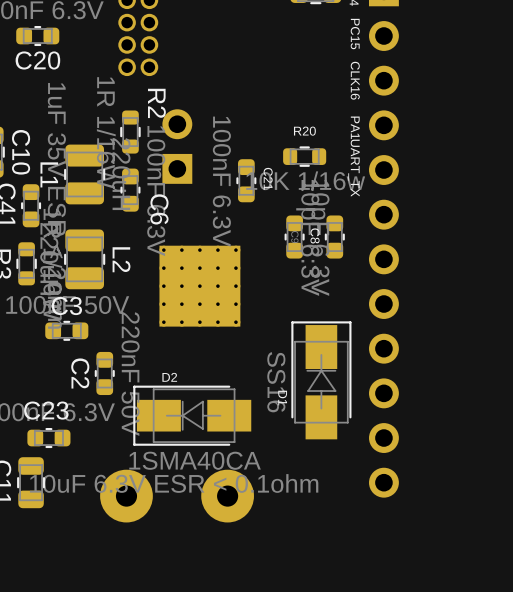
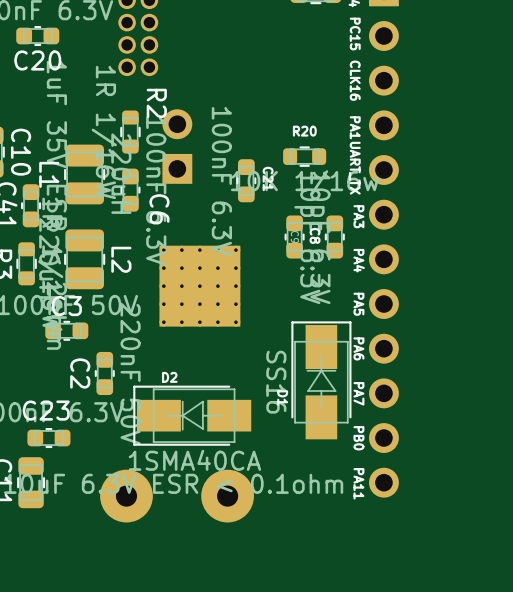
text: none -> PA3 (358, 216)
text: none -> PA4 (359, 260)
text: none -> PA5 (358, 304)
text: none -> PA6 (358, 348)
text: none -> PA7 (358, 393)
text: none -> PB0 (358, 438)
text: none -> PA11 (358, 483)

